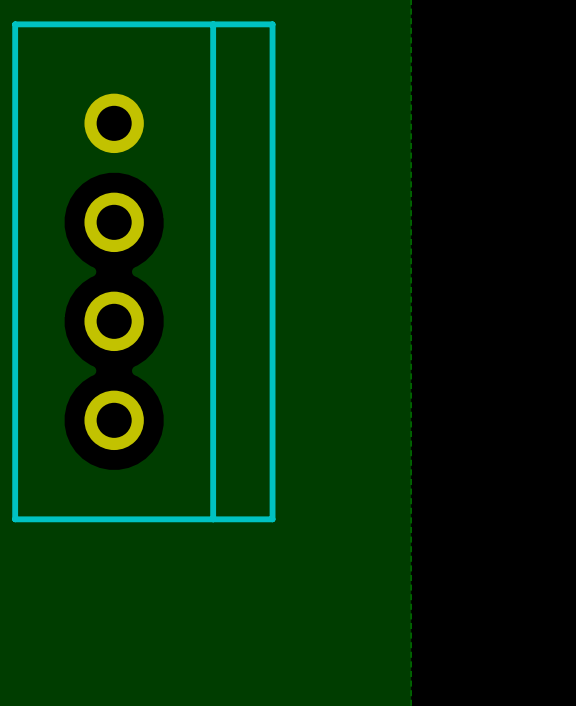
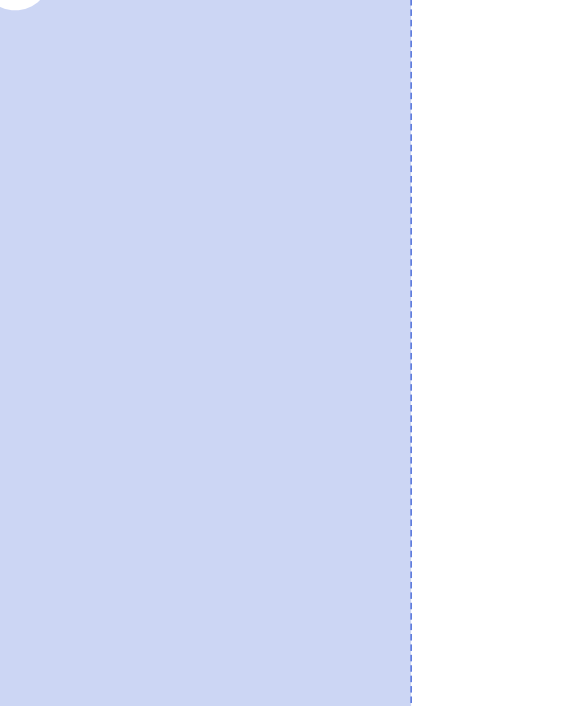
part: (143, 271) -> none

